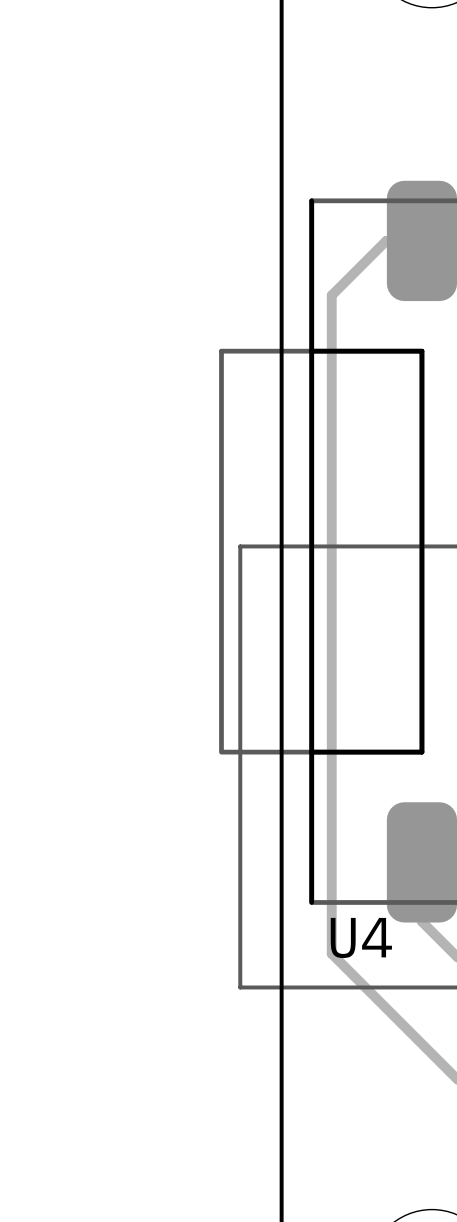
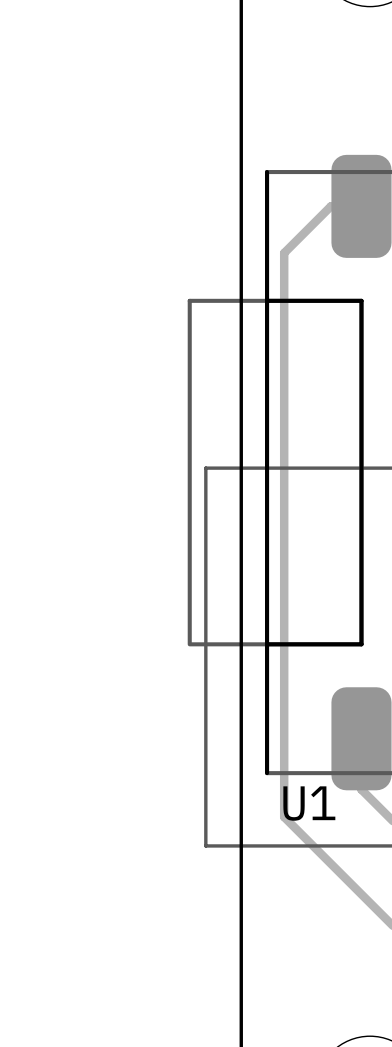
U4 name: U4 (361, 937) -> U1 (309, 803)

